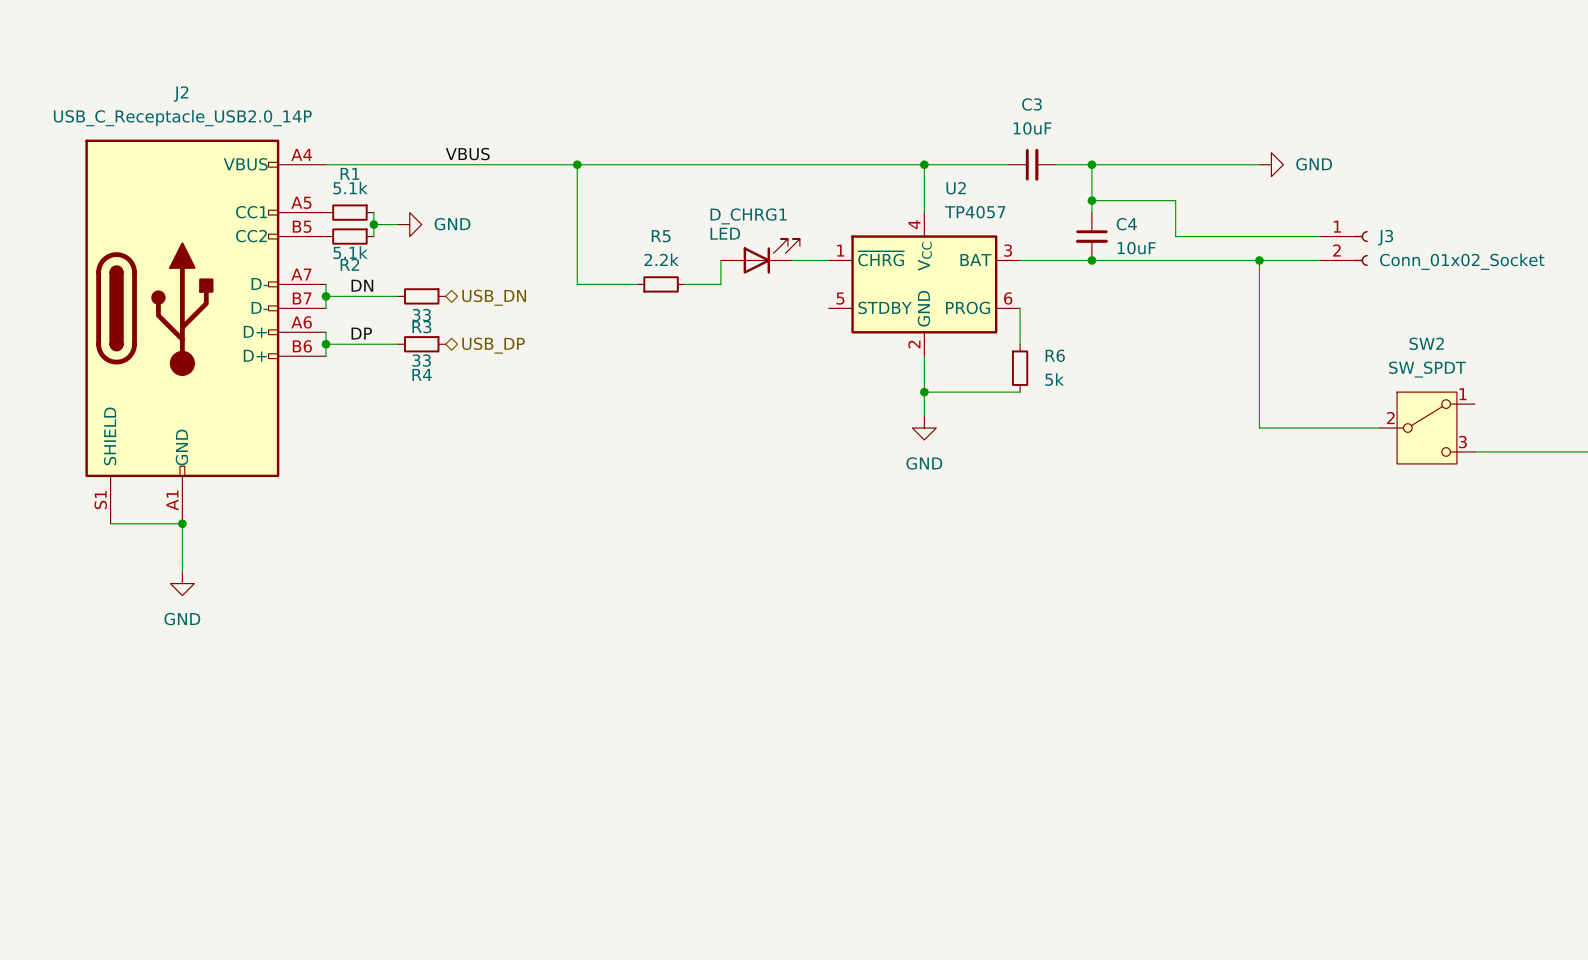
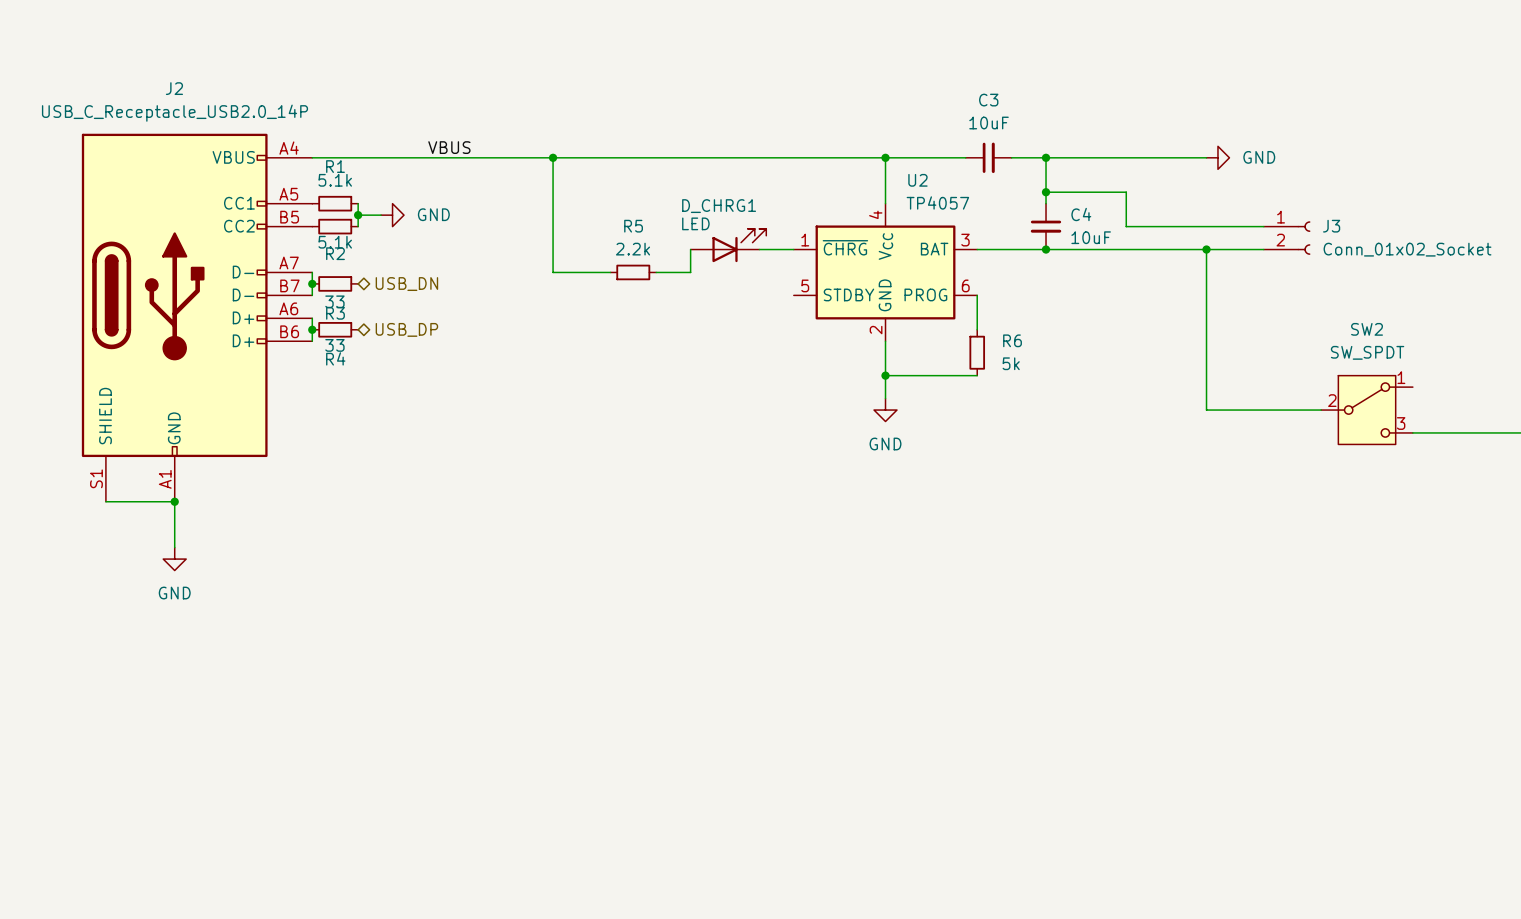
label: DN (362, 285) -> none
wire: (325, 296) (397, 296) -> none
R3 position: (421, 296) -> (335, 283)
hierarchical label position: USB_DN (494, 297) -> USB_DN (406, 284)
label: DP (361, 333) -> none
wire: (325, 344) (397, 344) -> none
R4 position: (421, 344) -> (335, 329)
hierarchical label position: USB_DP (493, 345) -> USB_DP (406, 329)

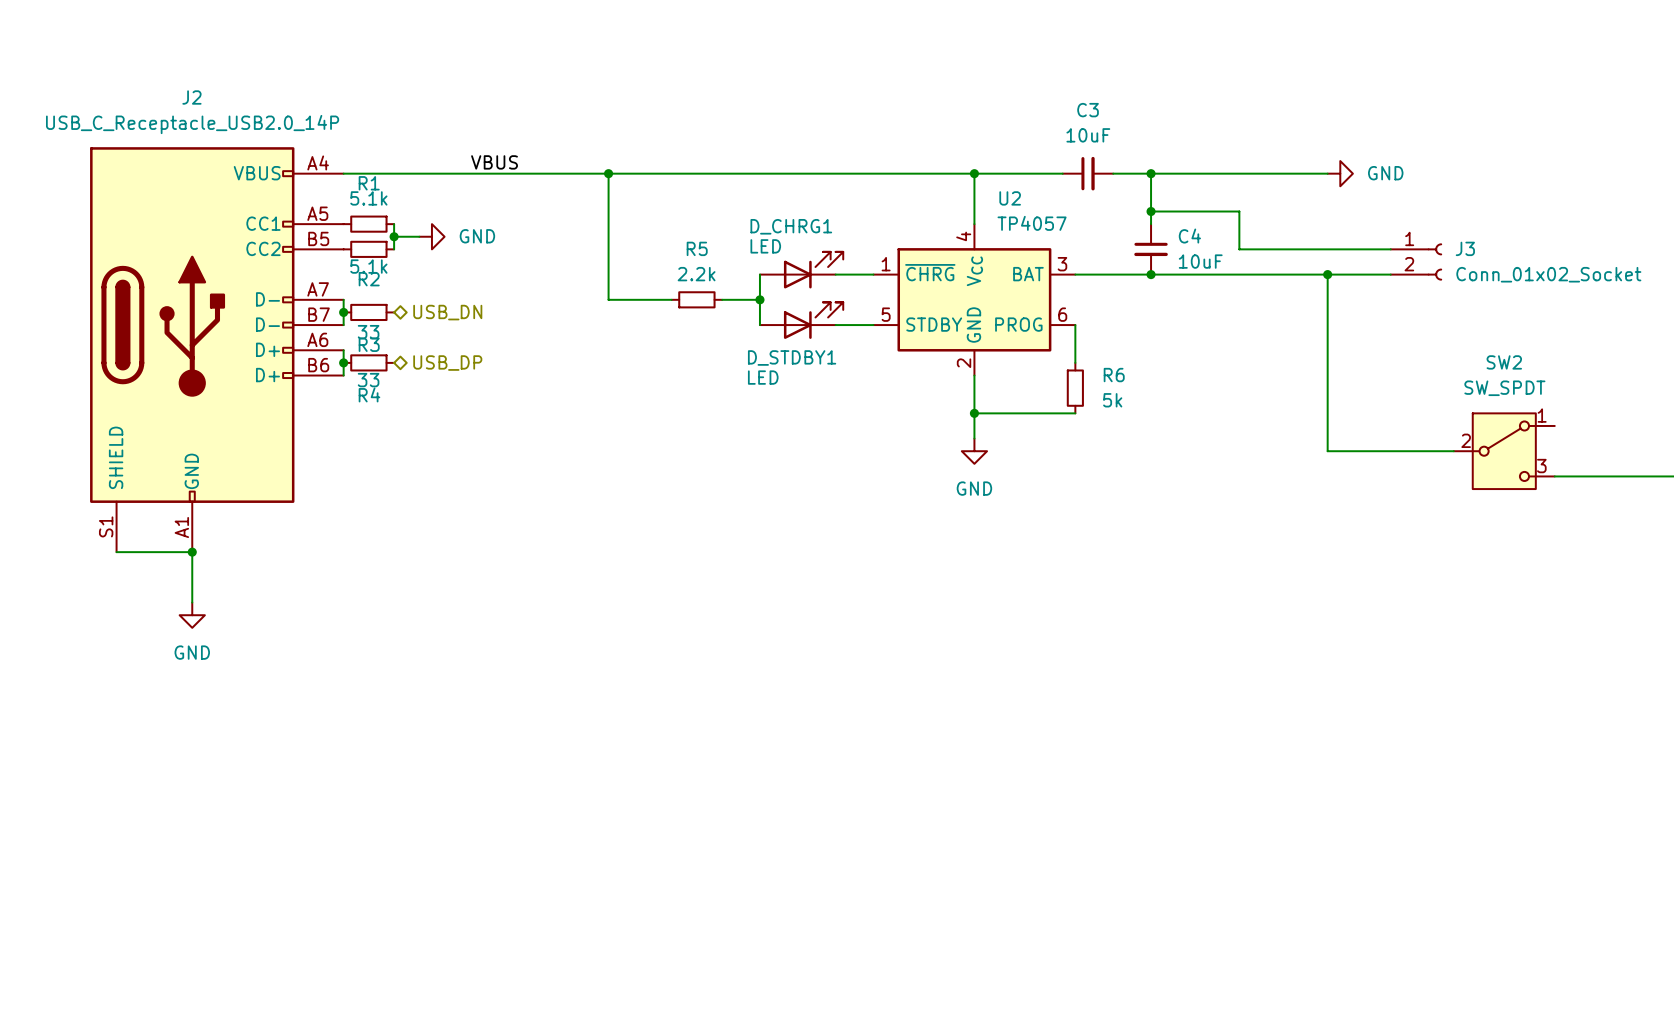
wire: none -> (759, 299) (759, 325)
junction: none -> (759, 299)
D_STDBY1: none -> LED (801, 320)
wire: none -> (835, 325) (873, 325)

